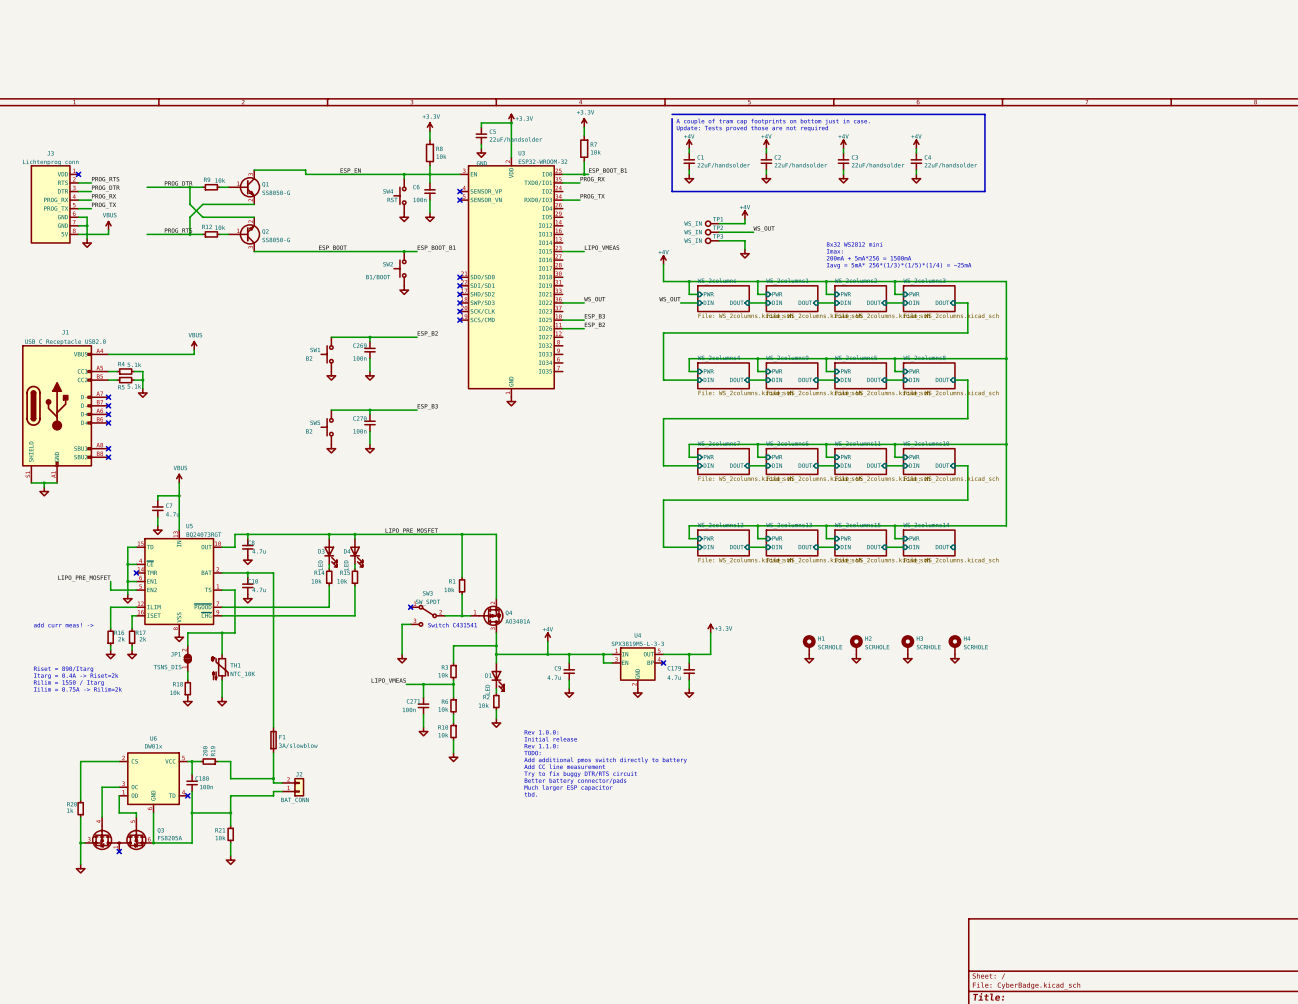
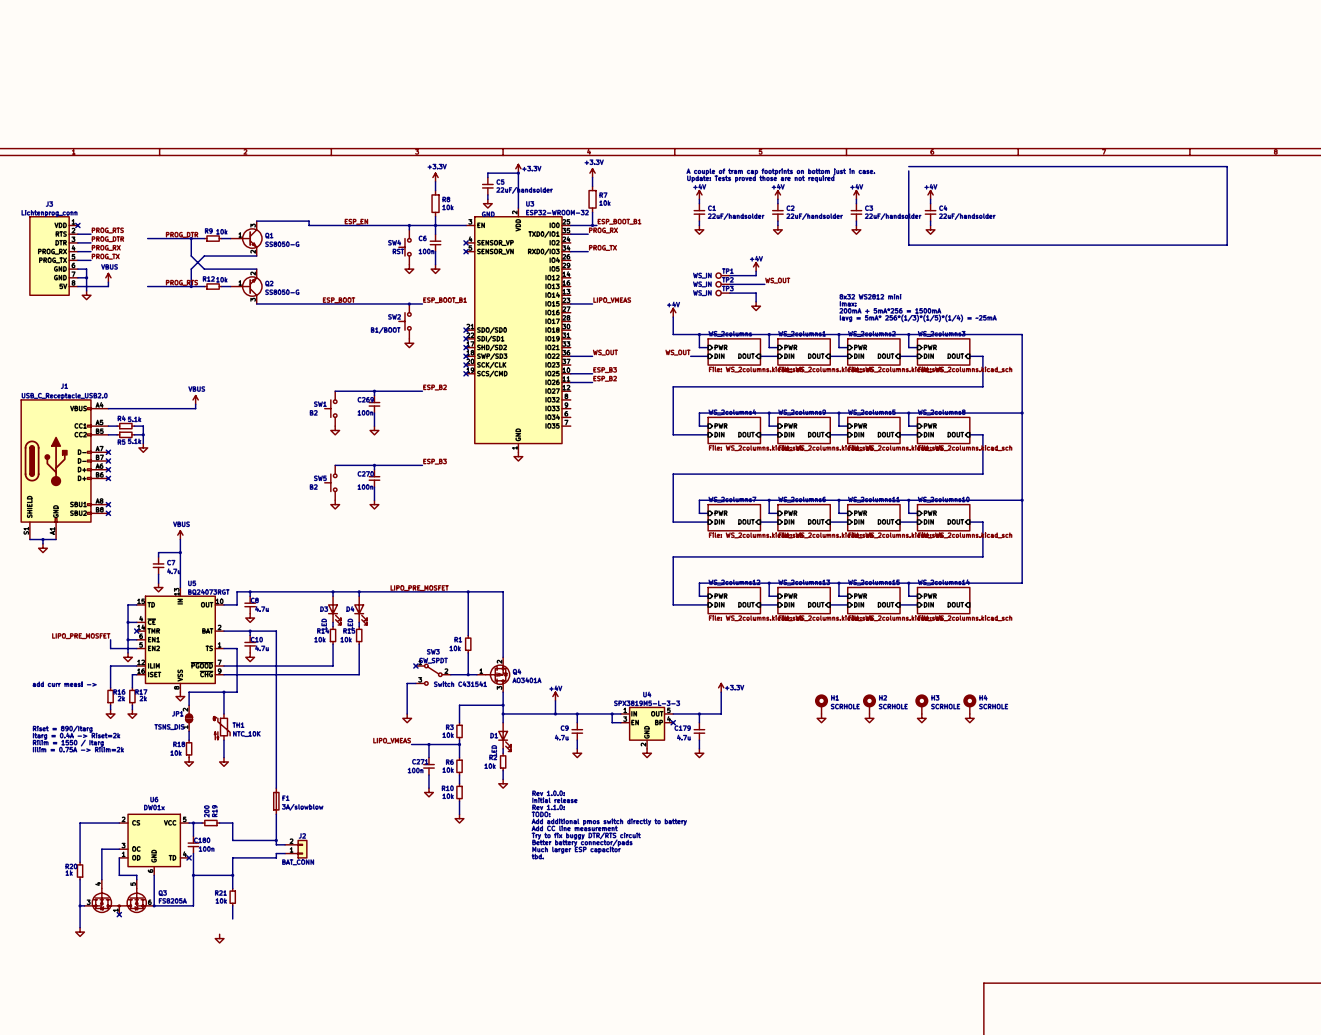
line: (672, 114) (984, 114) (984, 191) (672, 191) (672, 118) -> none
line: none -> (908, 166) (1227, 166) (1227, 245) (908, 245) (908, 170)
power symbol position: (230, 860) -> (219, 938)

